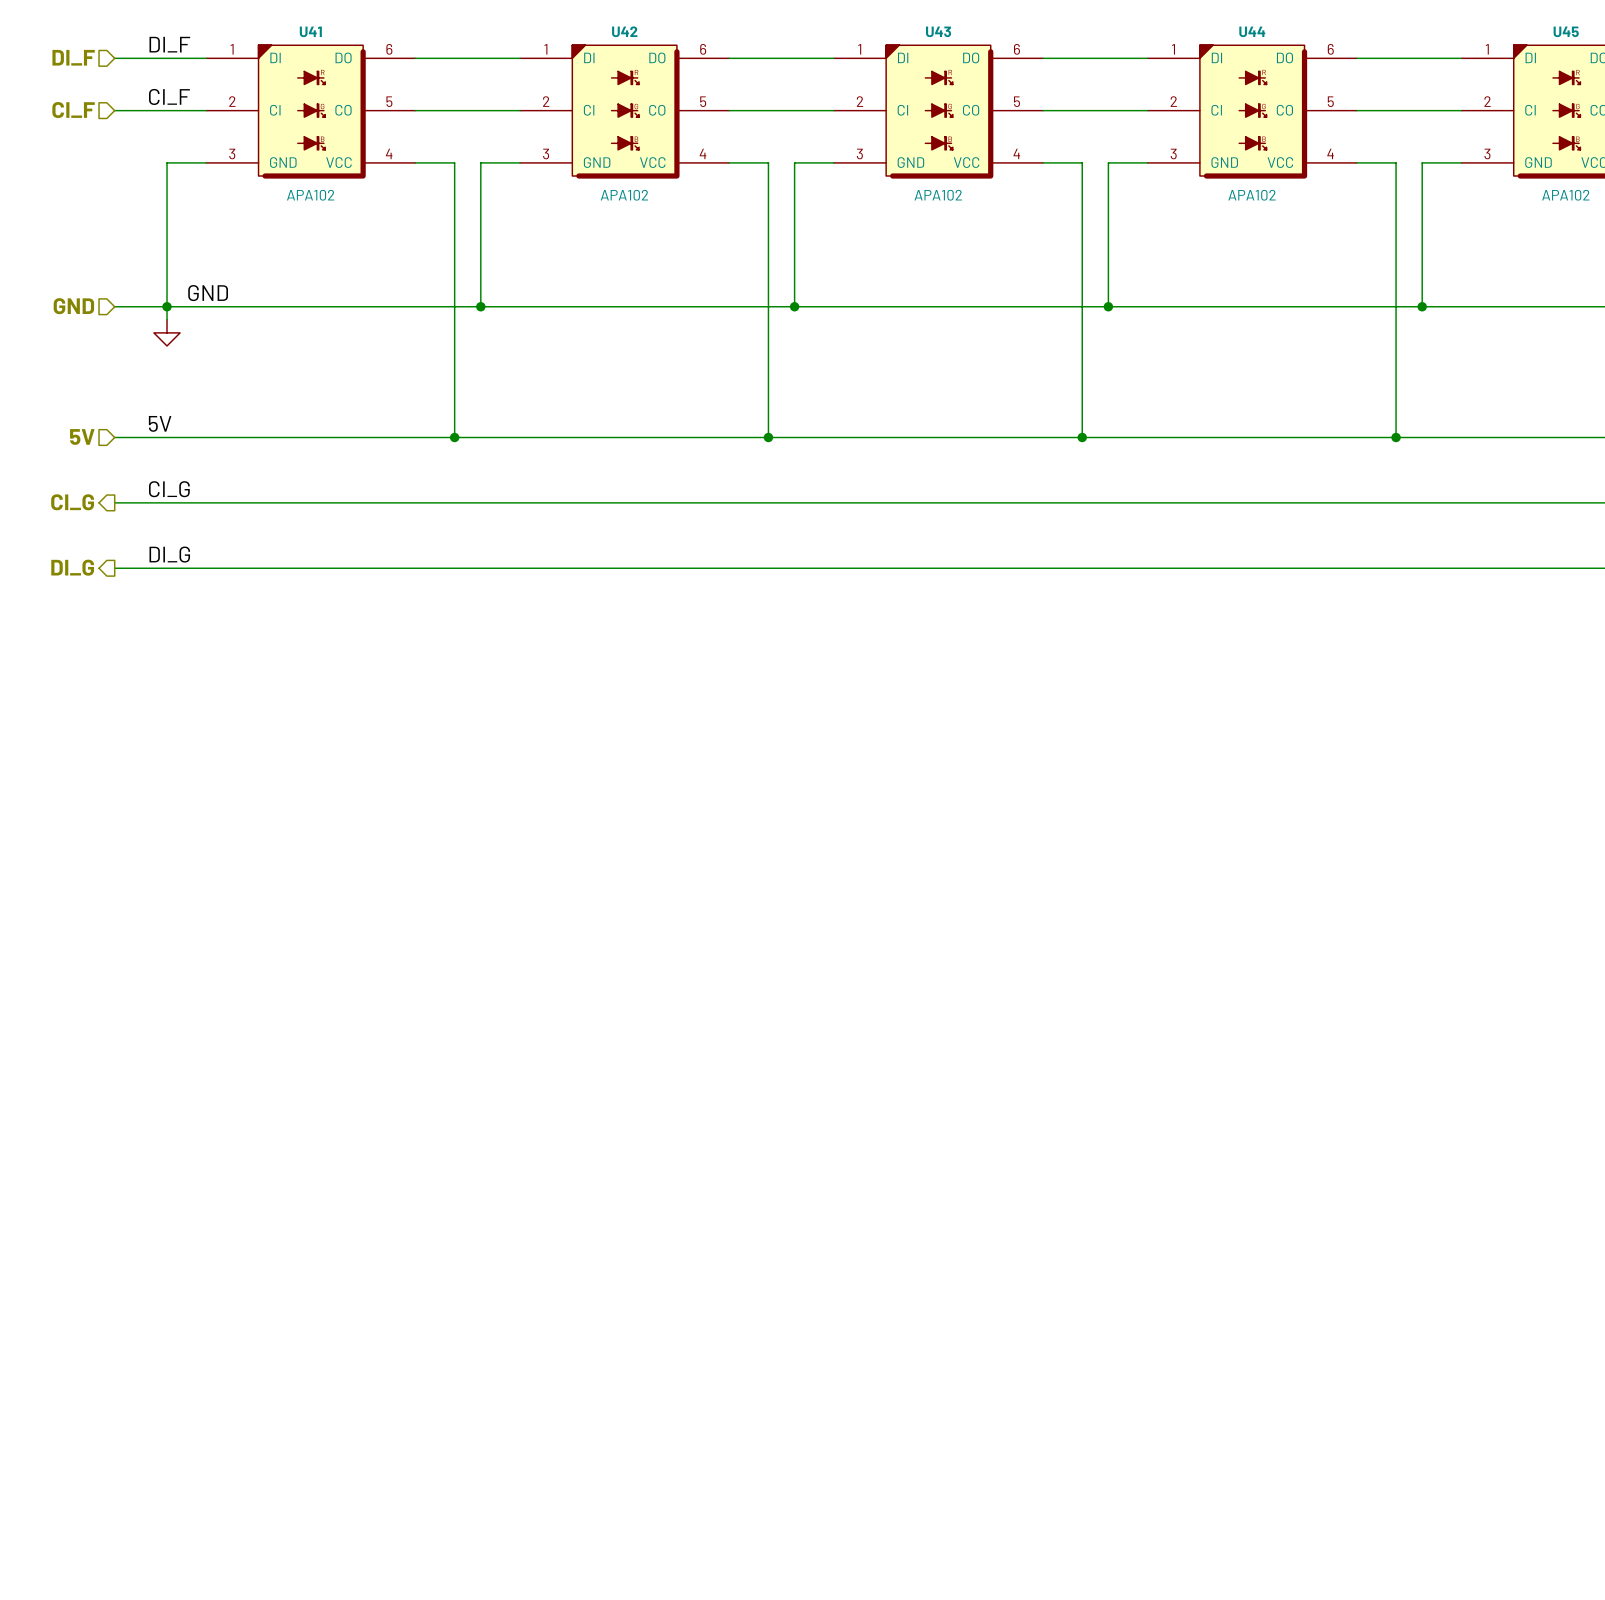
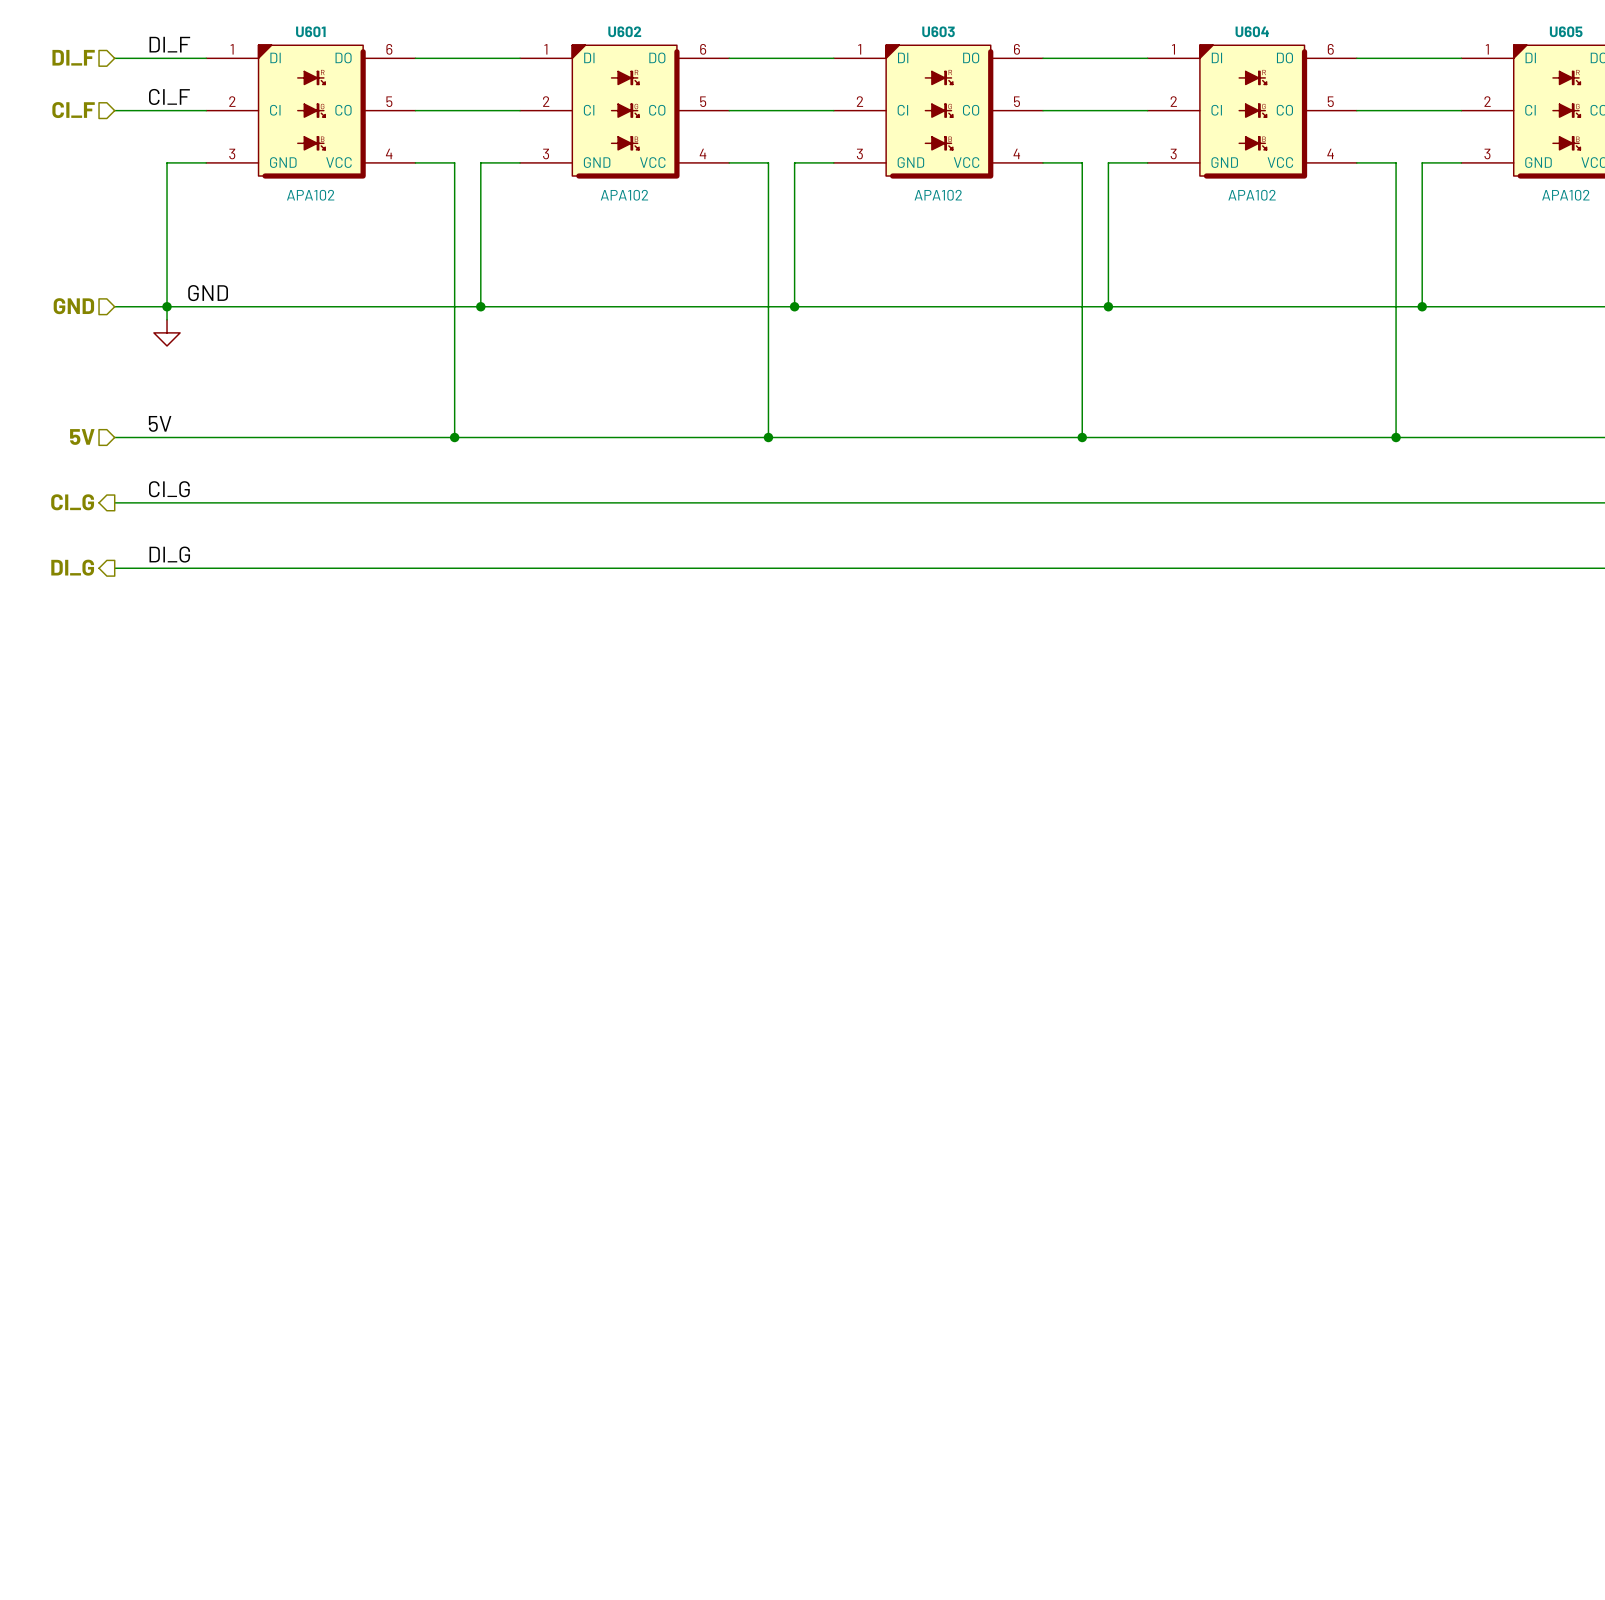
U41 name: U41 (310, 31) -> U601 (310, 31)
U42 name: U42 (624, 31) -> U602 (624, 31)
U43 name: U43 (938, 31) -> U603 (938, 31)
U44 name: U44 (1252, 31) -> U604 (1252, 31)
U45 name: U45 (1566, 31) -> U605 (1566, 31)

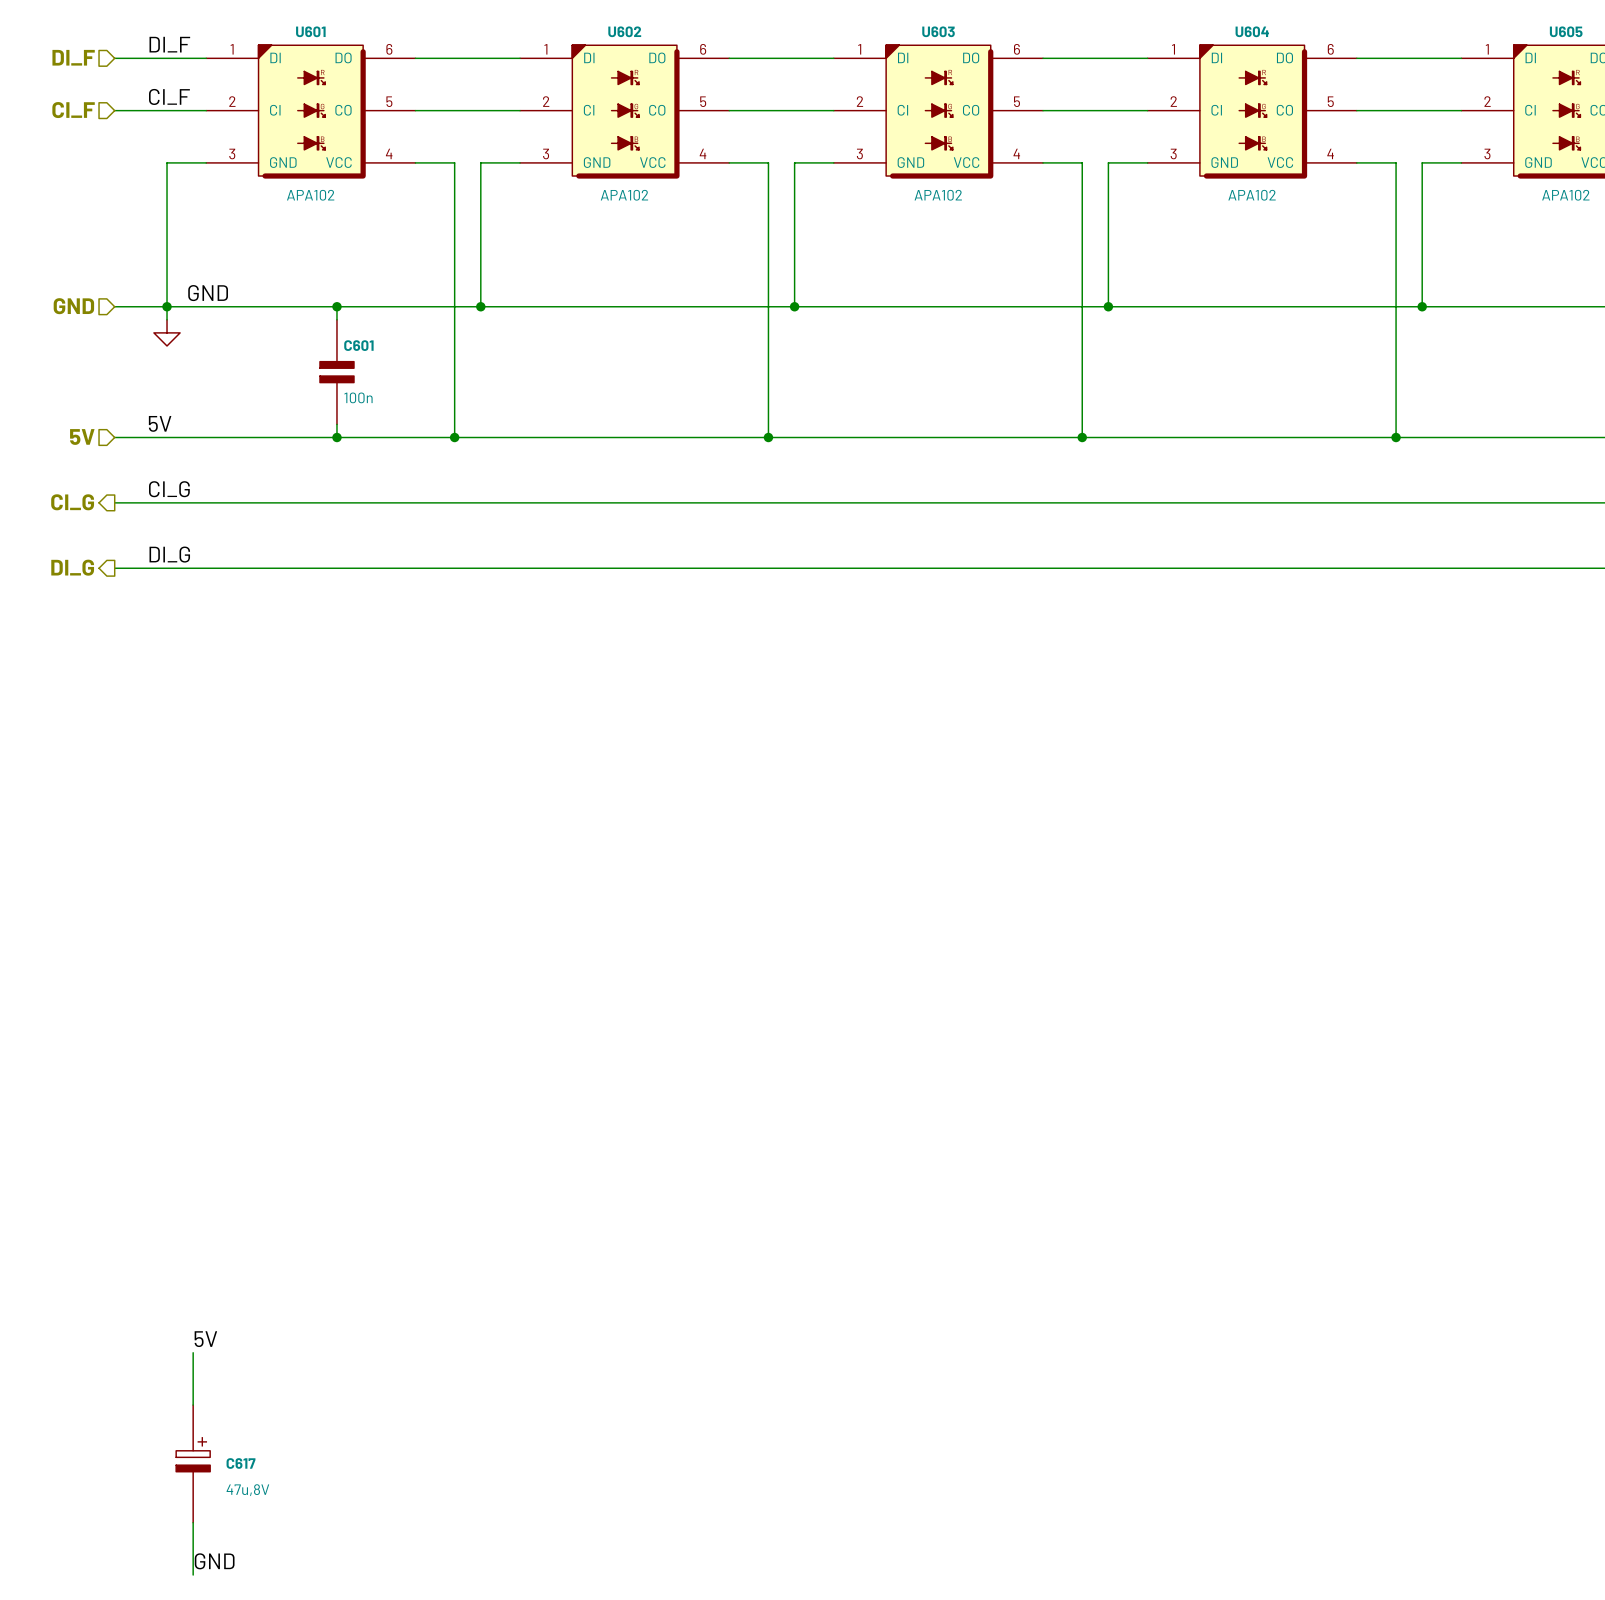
wire: none -> (336, 306) (336, 319)
junction: none -> (336, 306)
C601: none -> 100n (336, 372)
wire: none -> (336, 424) (336, 437)
junction: none -> (336, 437)
label: none -> 5V (205, 1339)
wire: none -> (193, 1352) (193, 1405)
C617: none -> 47u,8V (193, 1463)
wire: none -> (193, 1522) (193, 1575)
label: none -> GND (214, 1561)

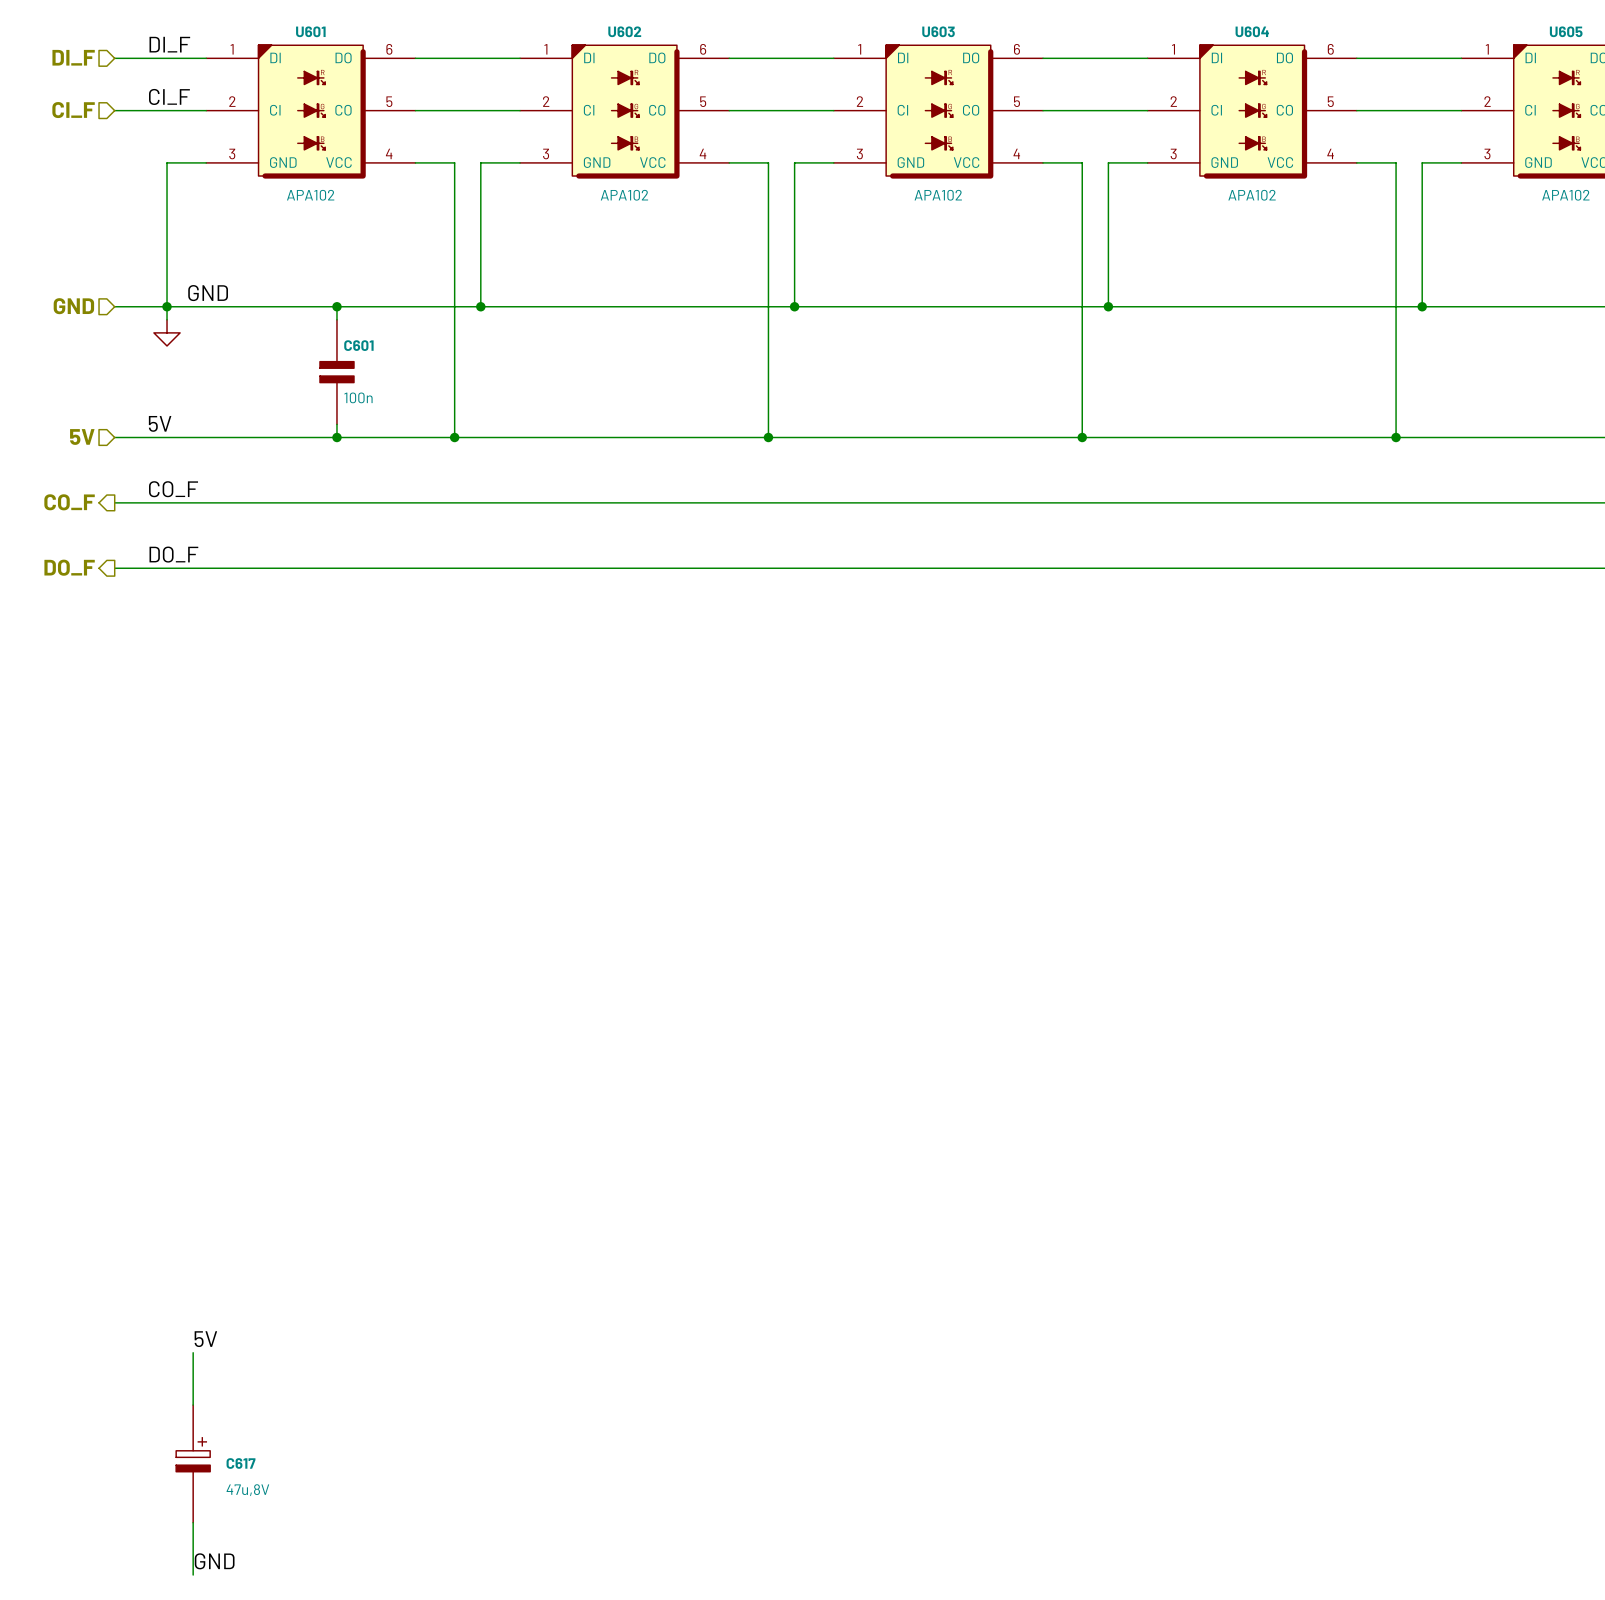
label: CI_G (169, 489) -> CO_F (173, 489)
hierarchical label: CI_G (72, 502) -> CO_F (69, 502)
label: DI_G (169, 554) -> DO_F (173, 554)
hierarchical label: DI_G (72, 567) -> DO_F (69, 567)

